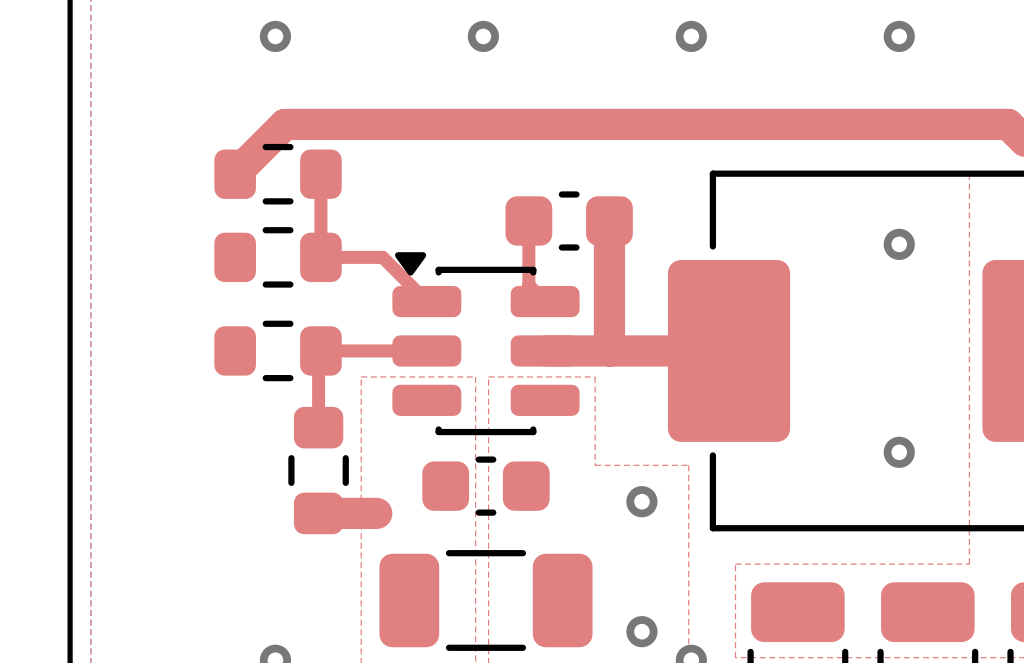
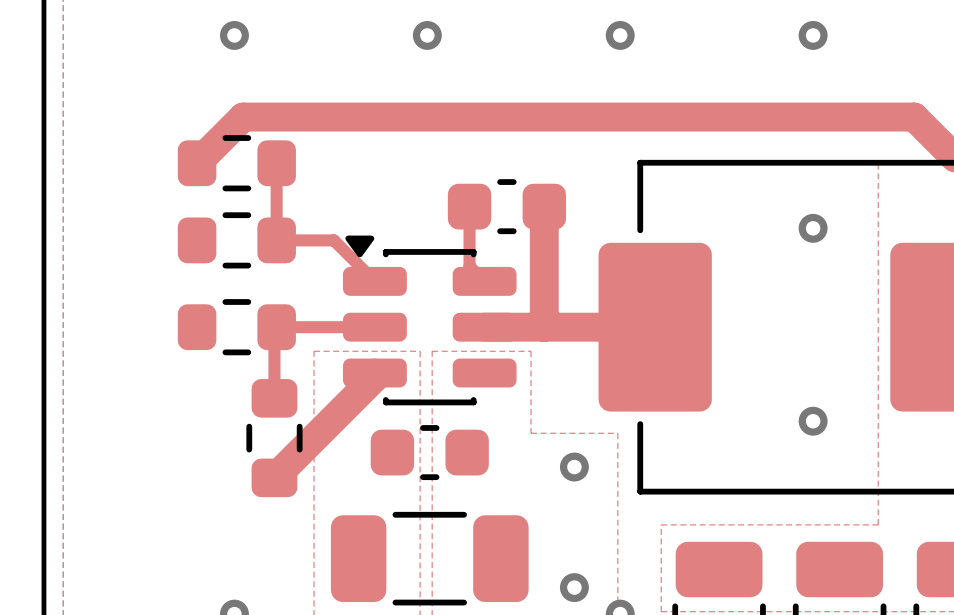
top track: (318, 513) (376, 513) -> (274, 477) (374, 377) (374, 373)

